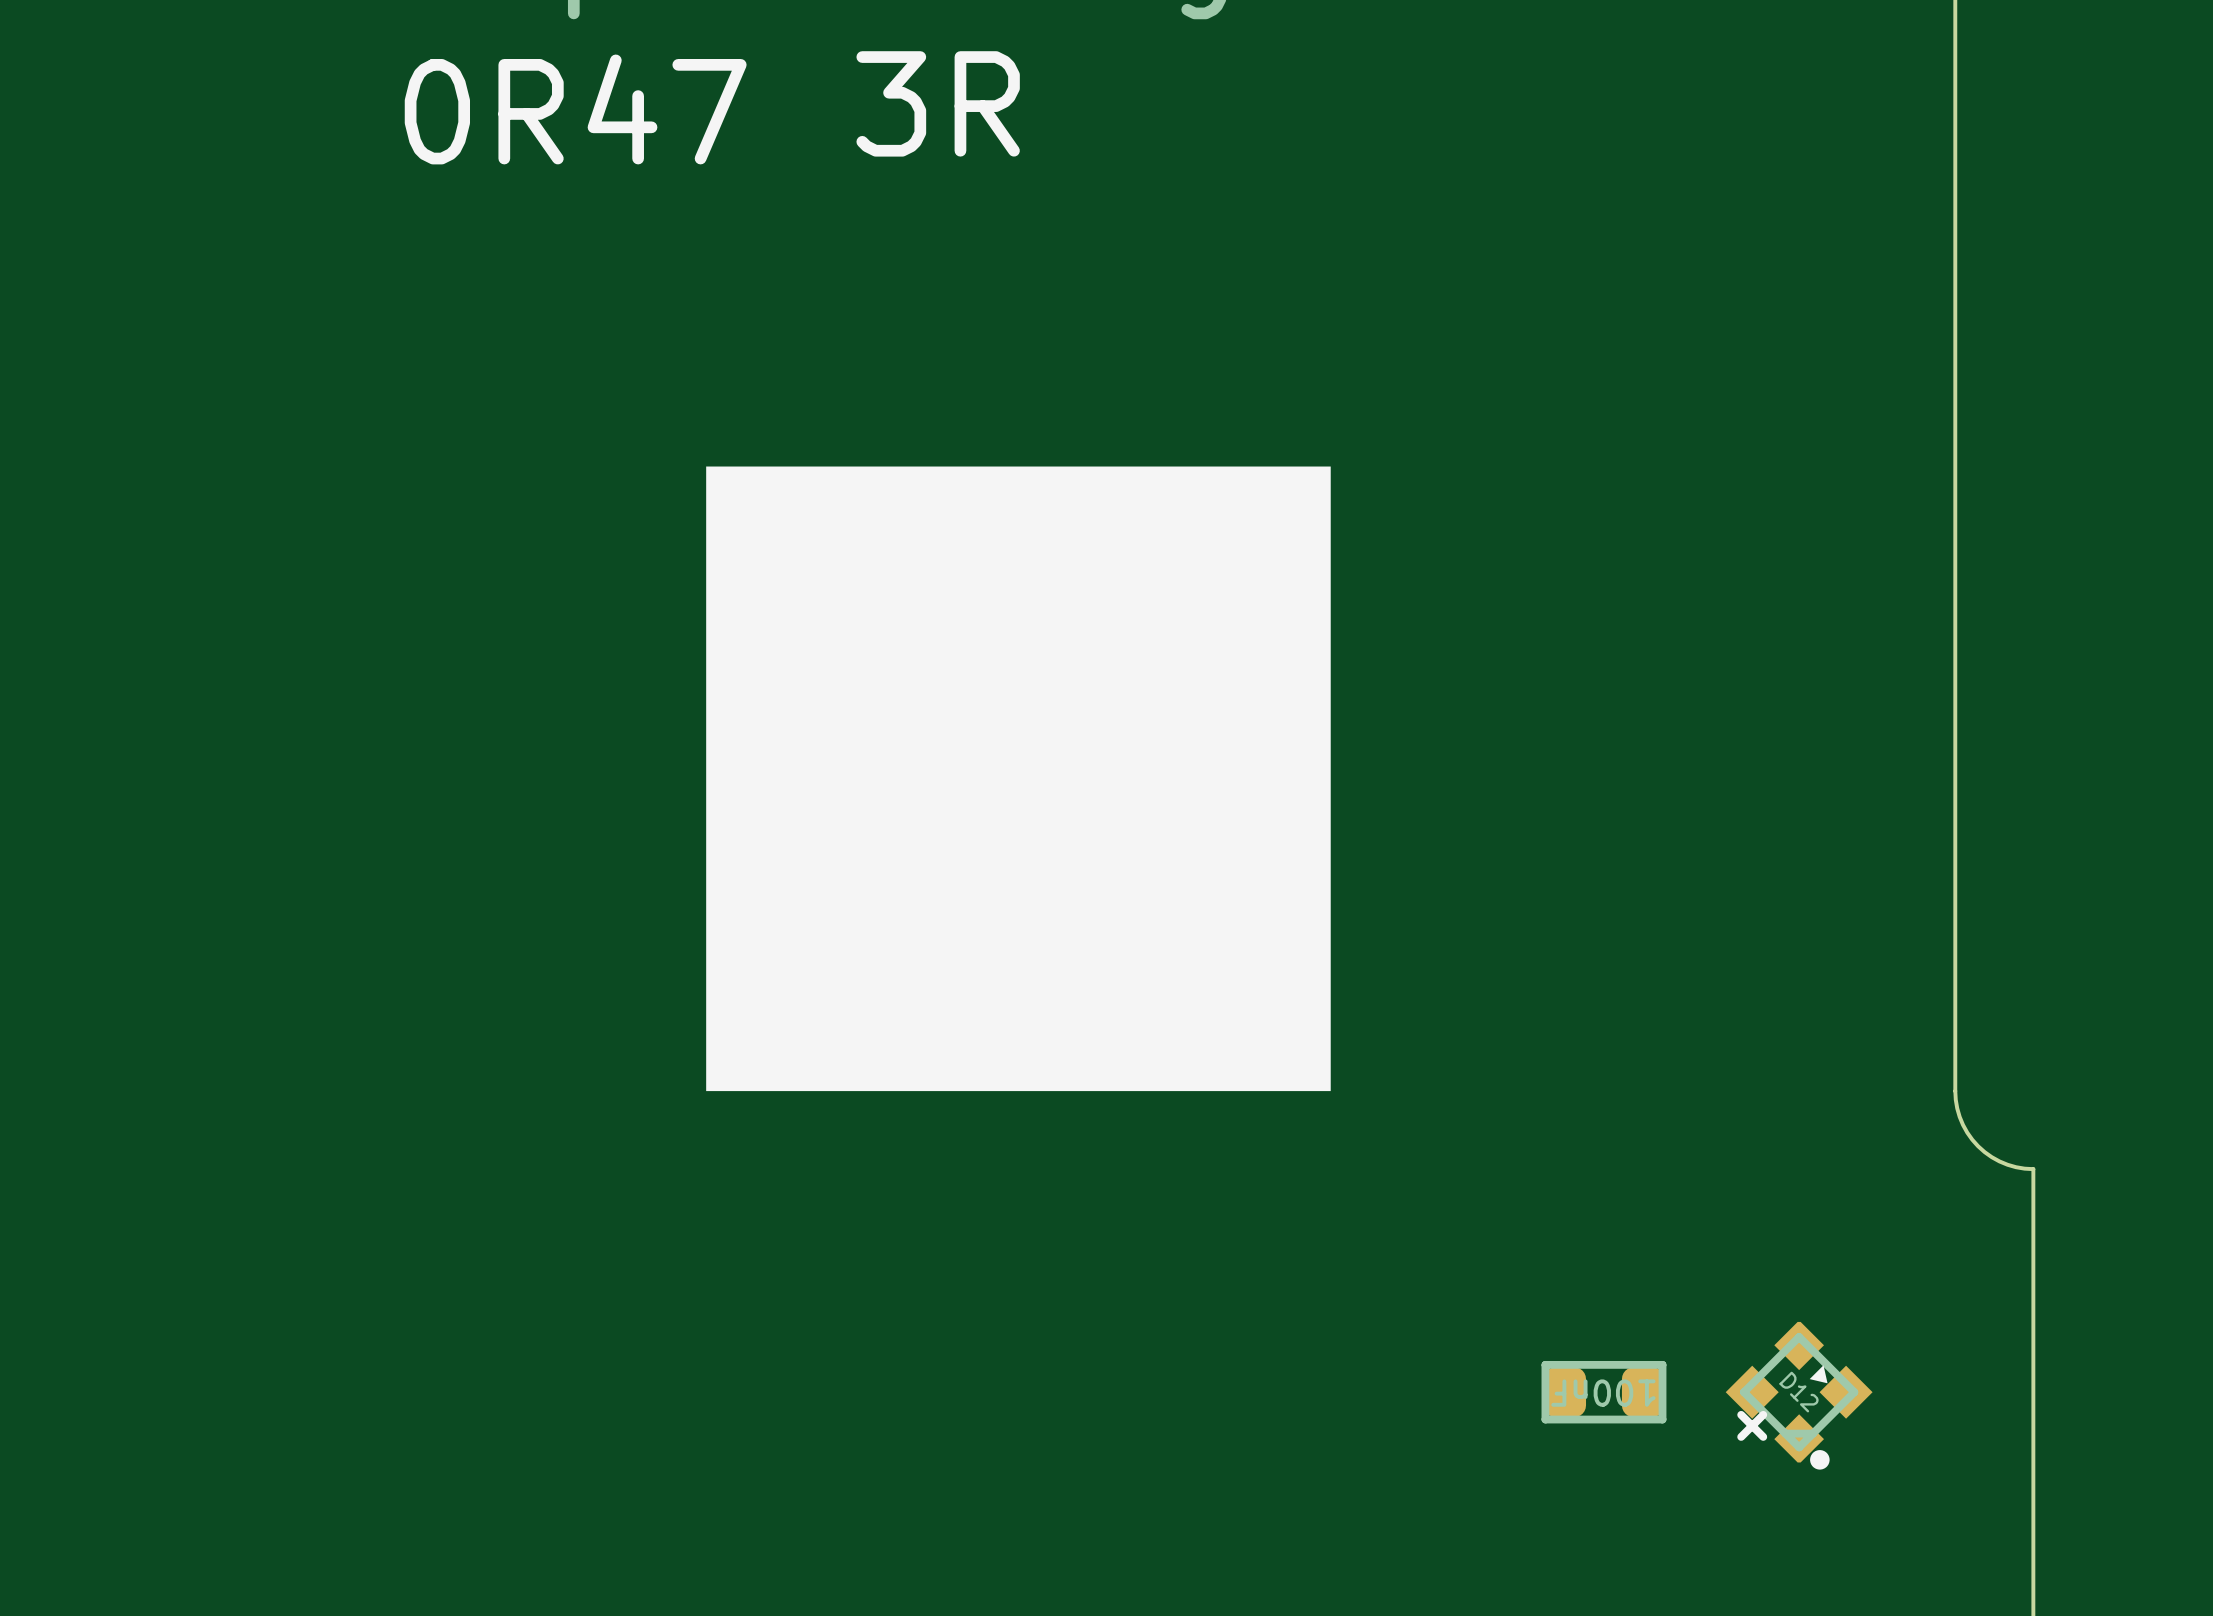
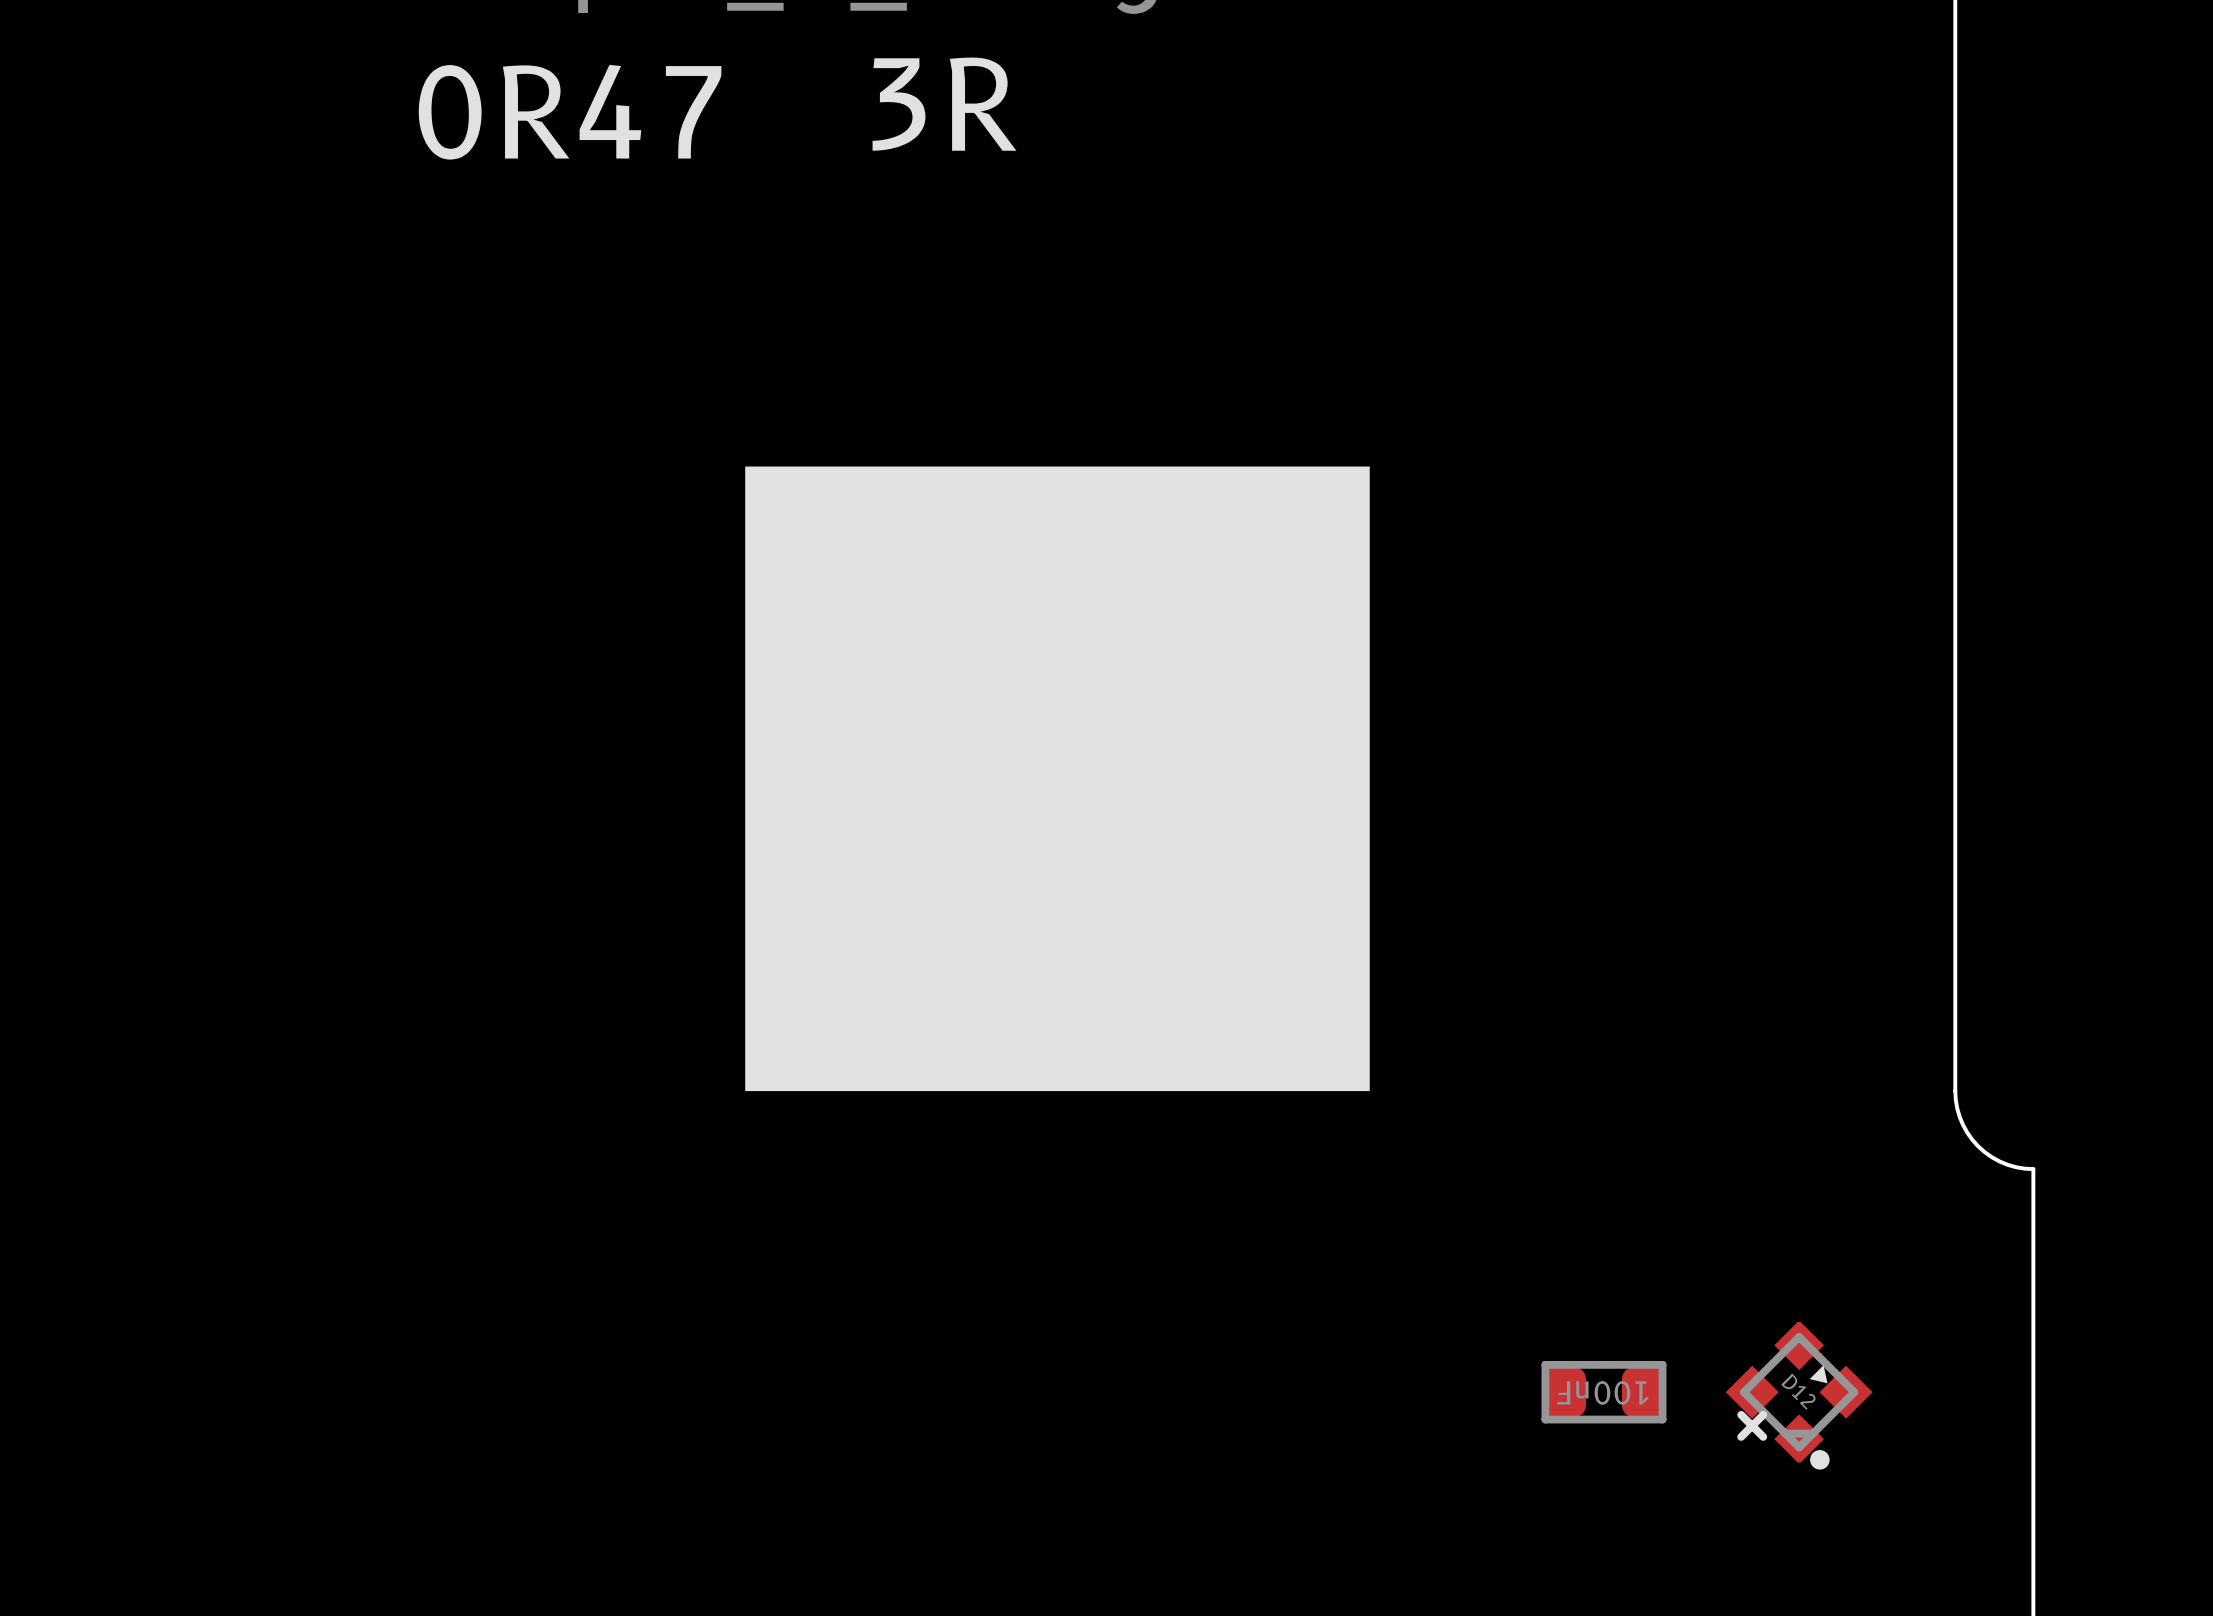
drawing position: (1018, 778) -> (1057, 778)

